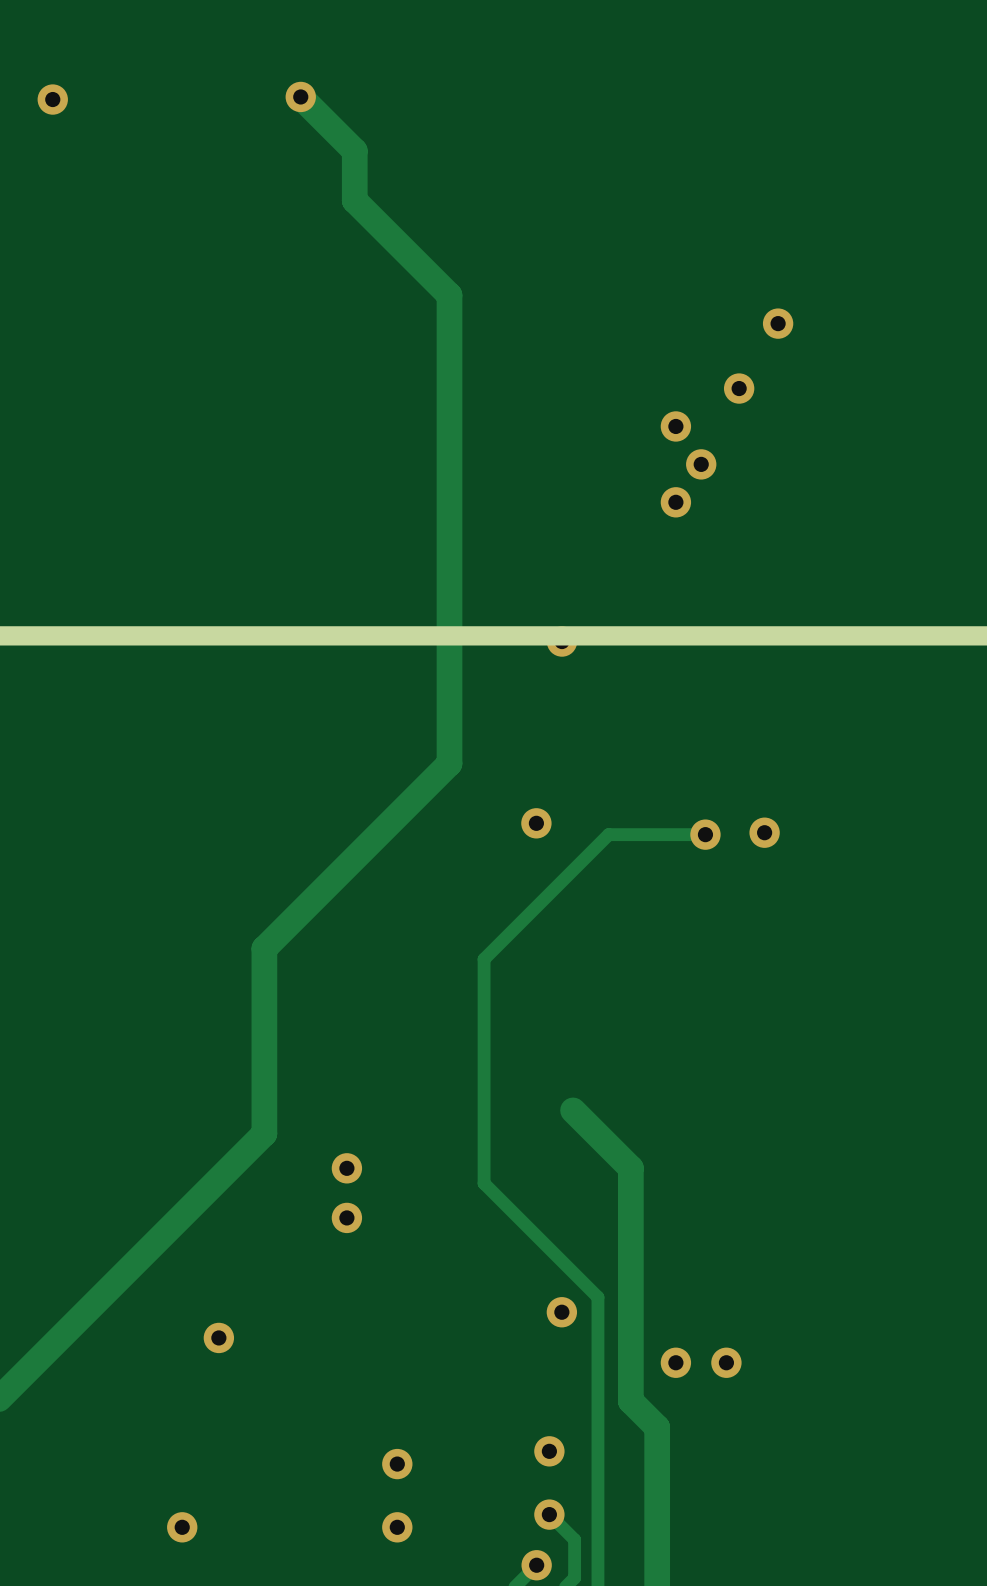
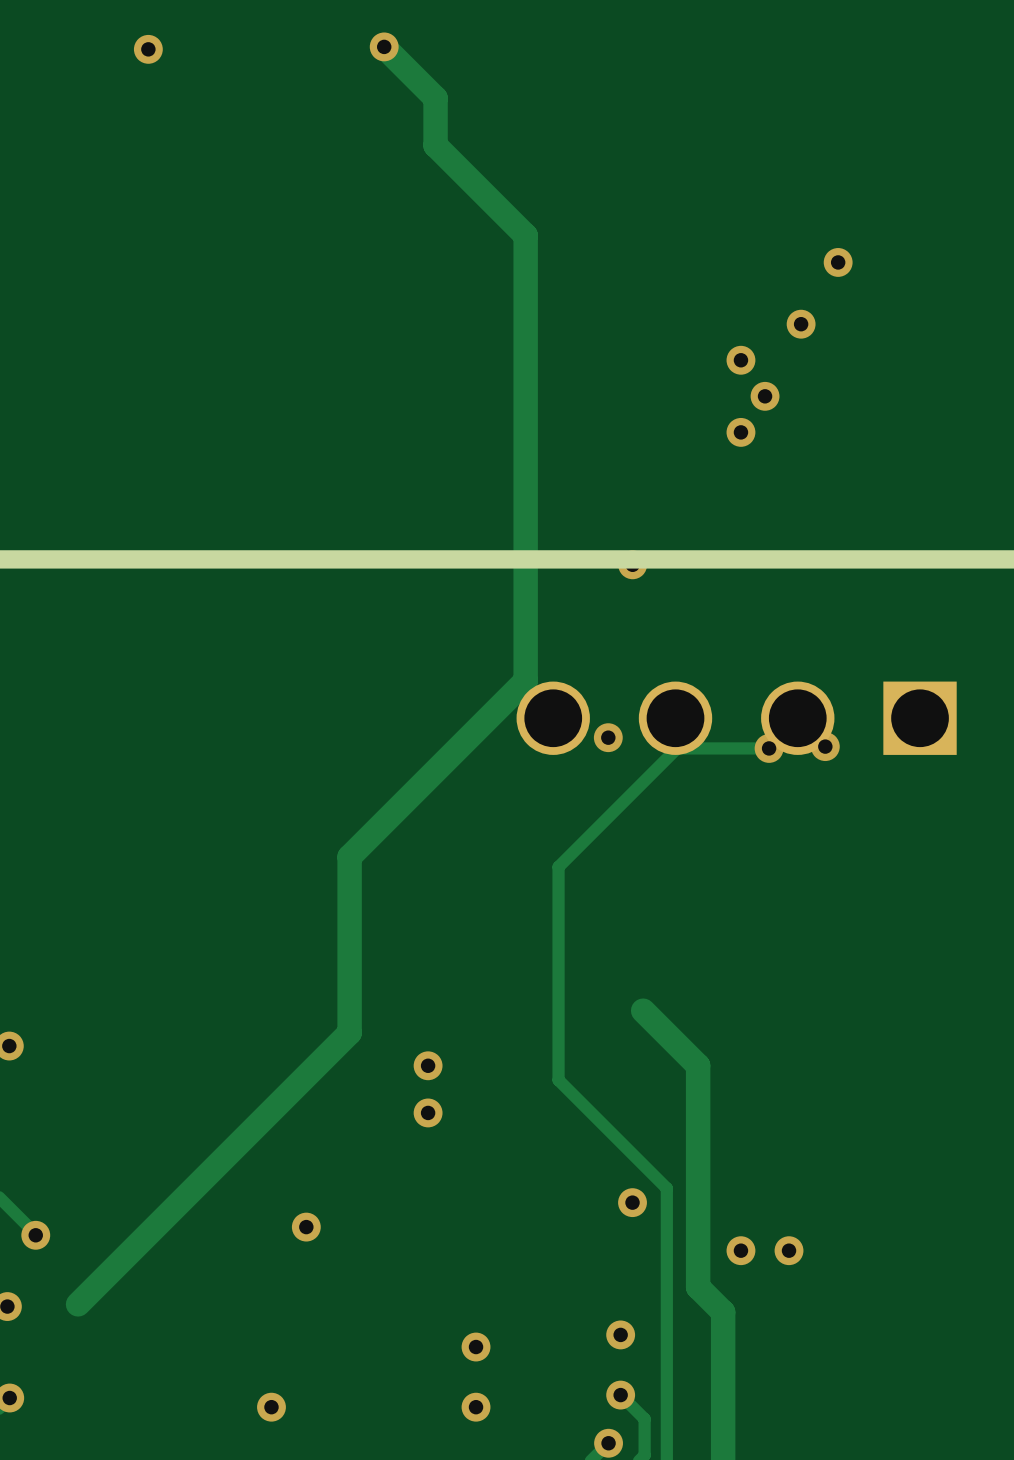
part: none -> (736, 718)

